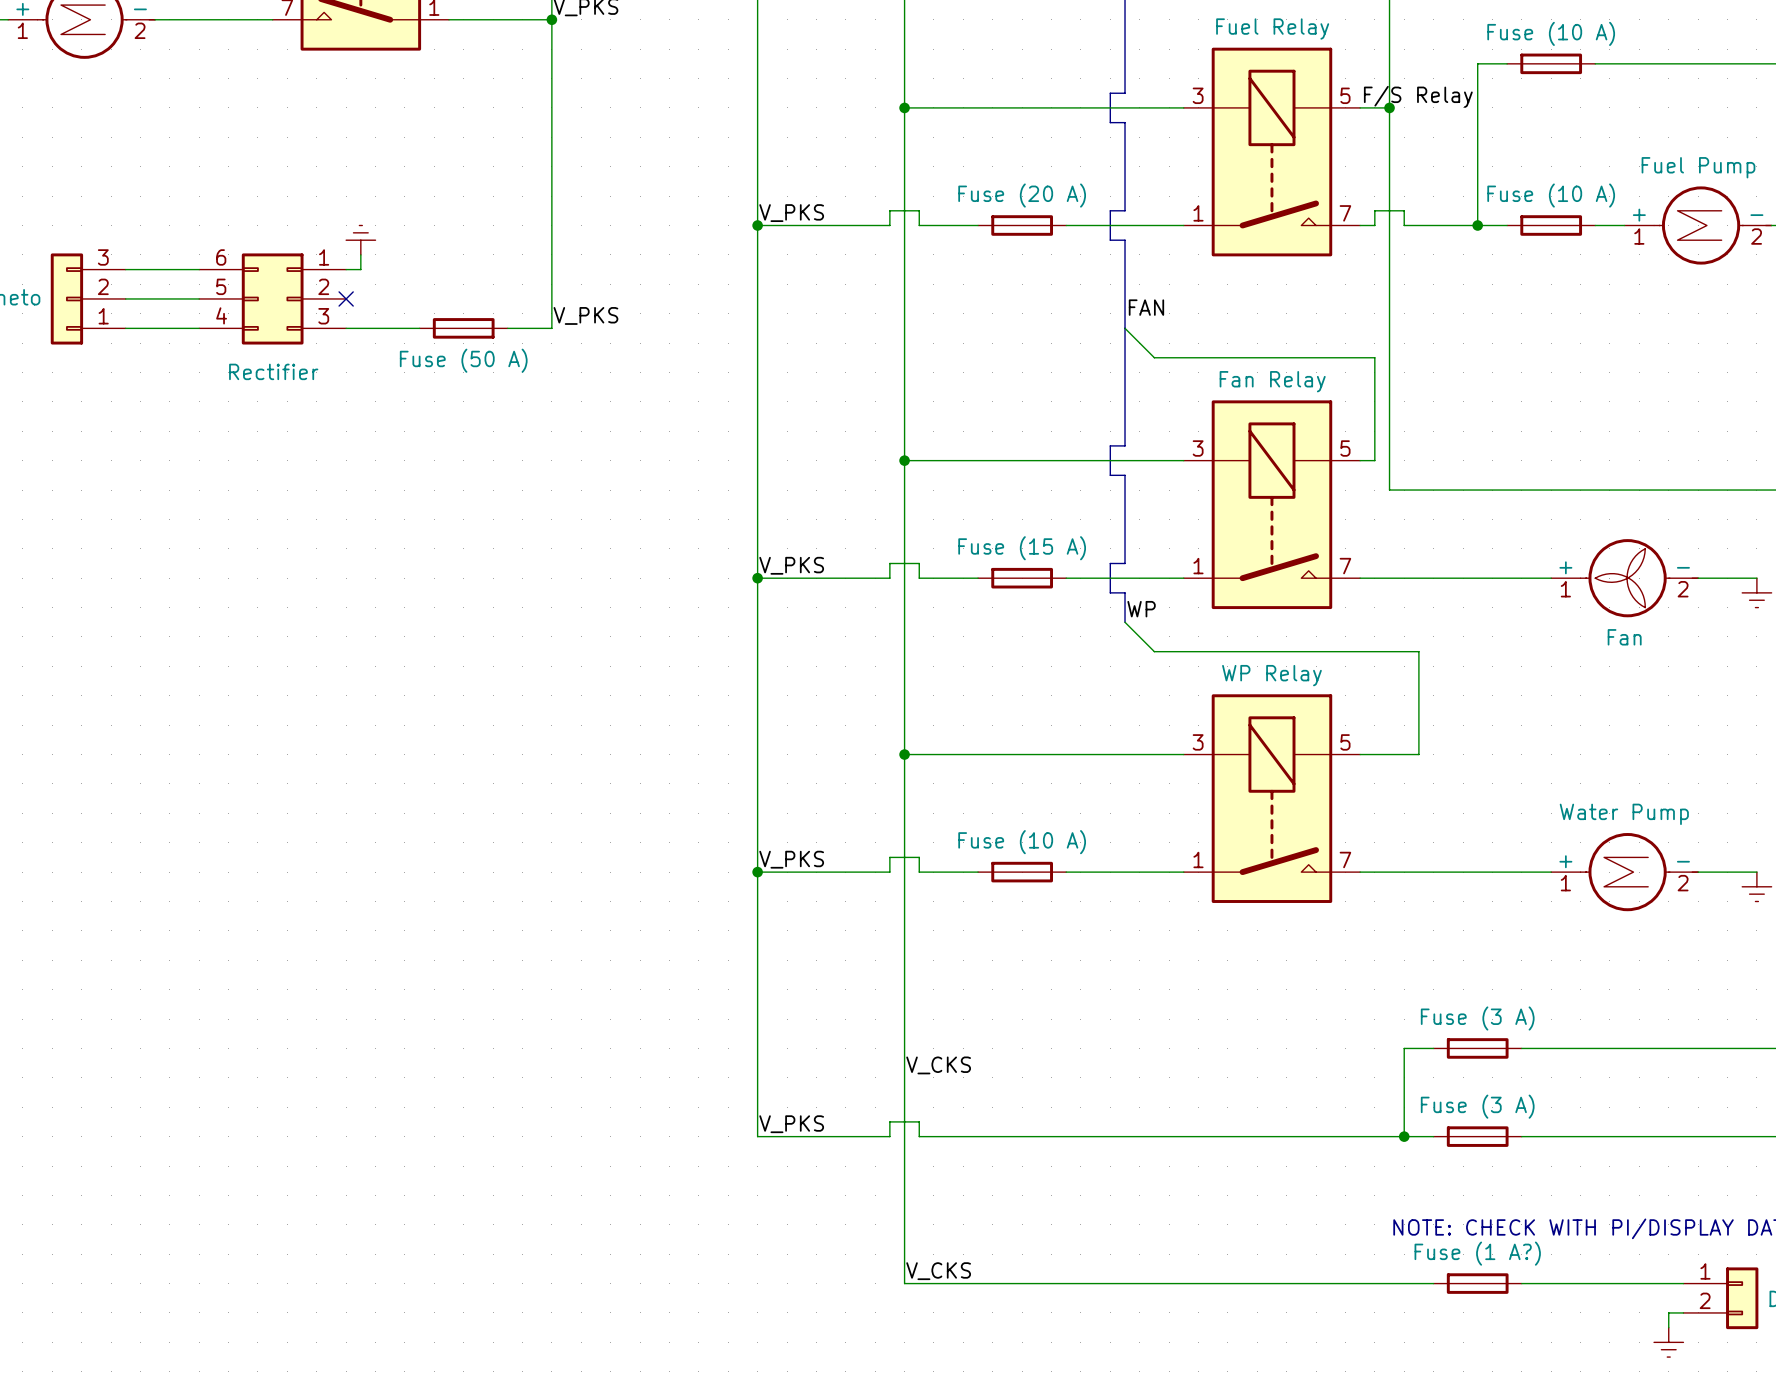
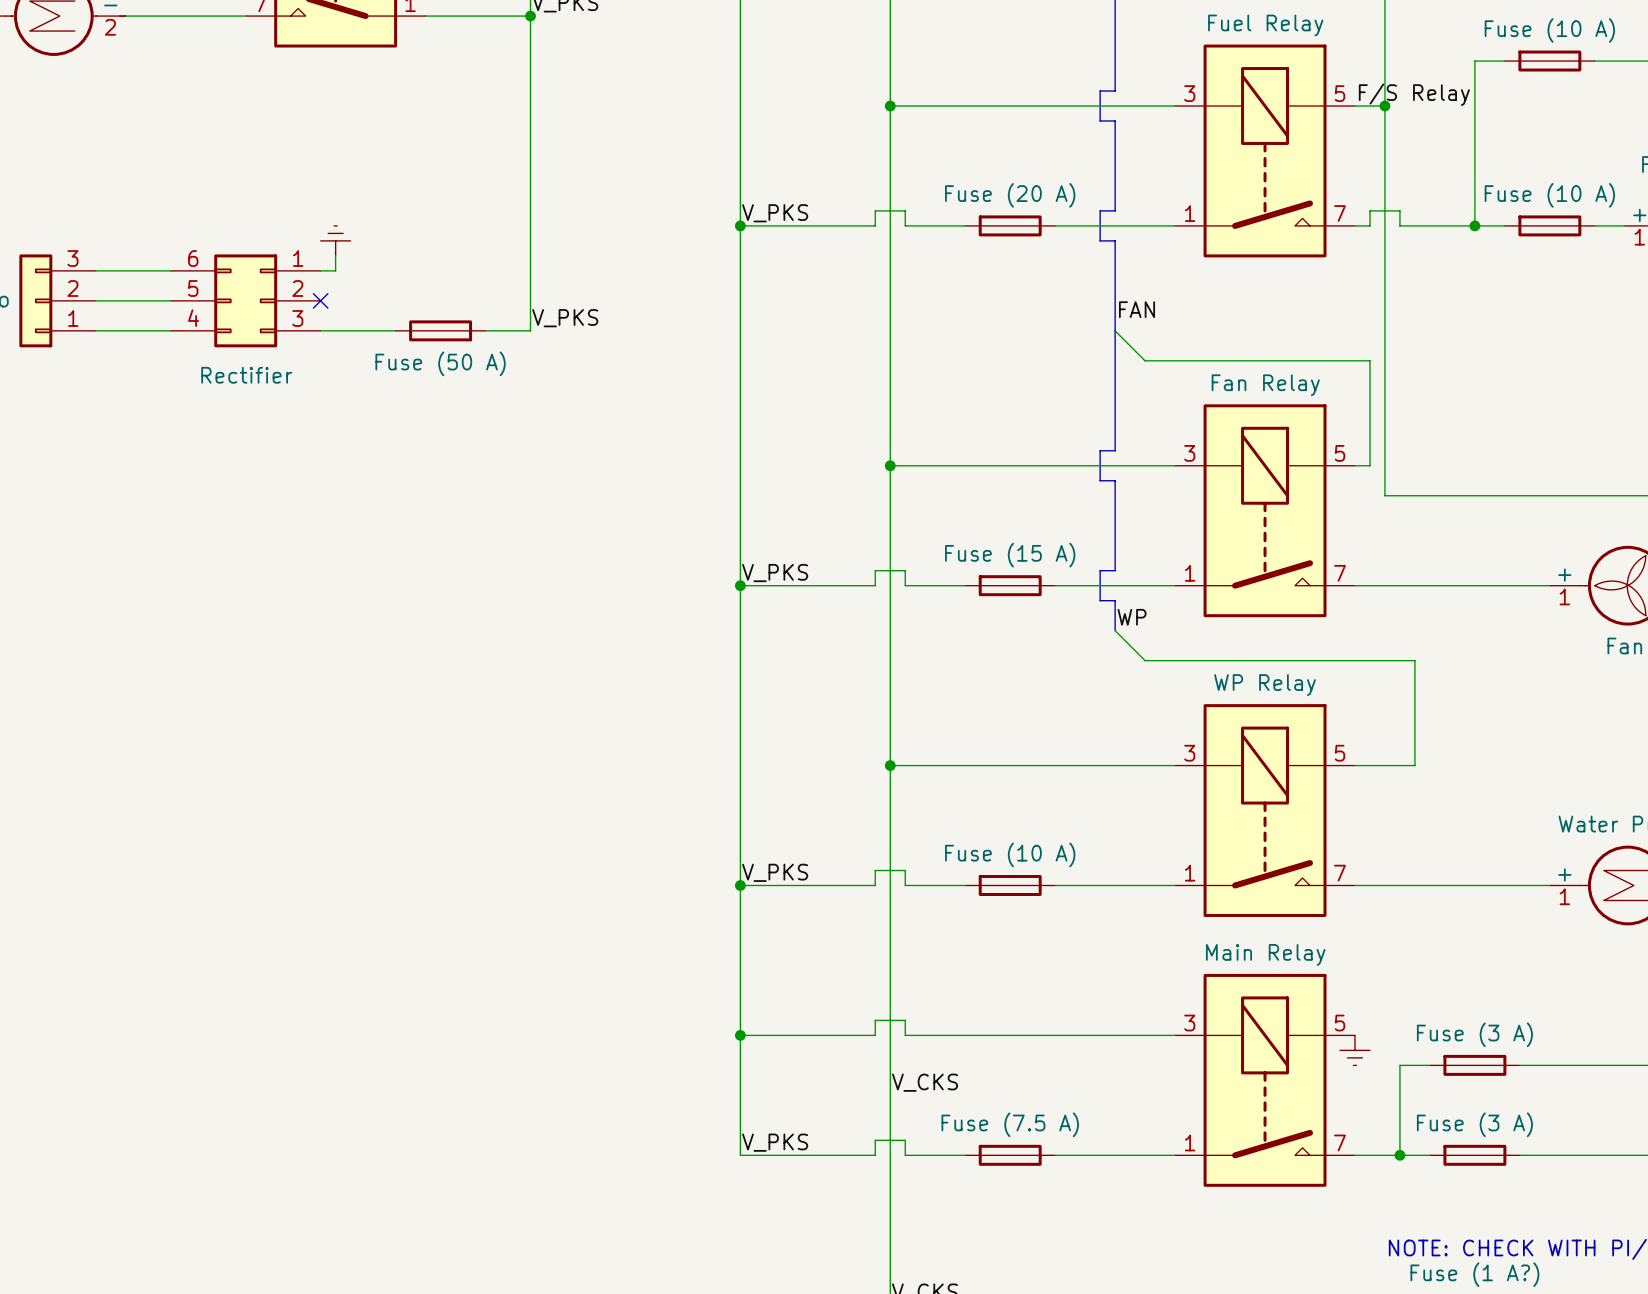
wire: none -> (740, 1035) (875, 1035) (875, 1020) (905, 1020) (905, 1035) (1175, 1035)
junction: none -> (740, 1035)
power symbol: none -> (1354, 1050)
part: none -> Main Relay (1265, 1080)
part: none -> Fuse (7.5 A) (1010, 1155)

